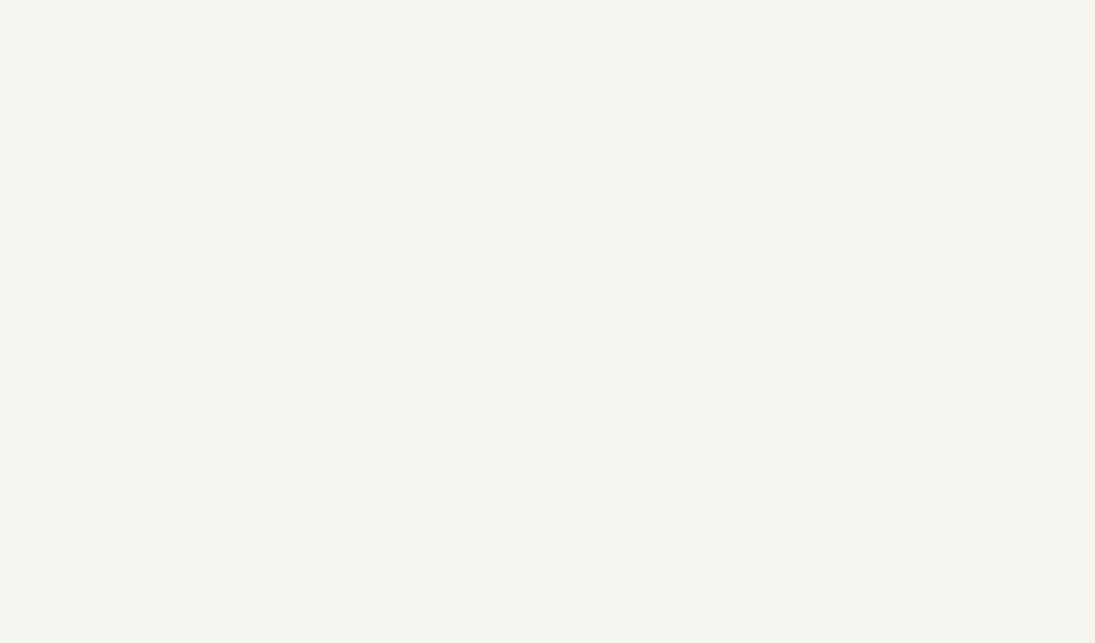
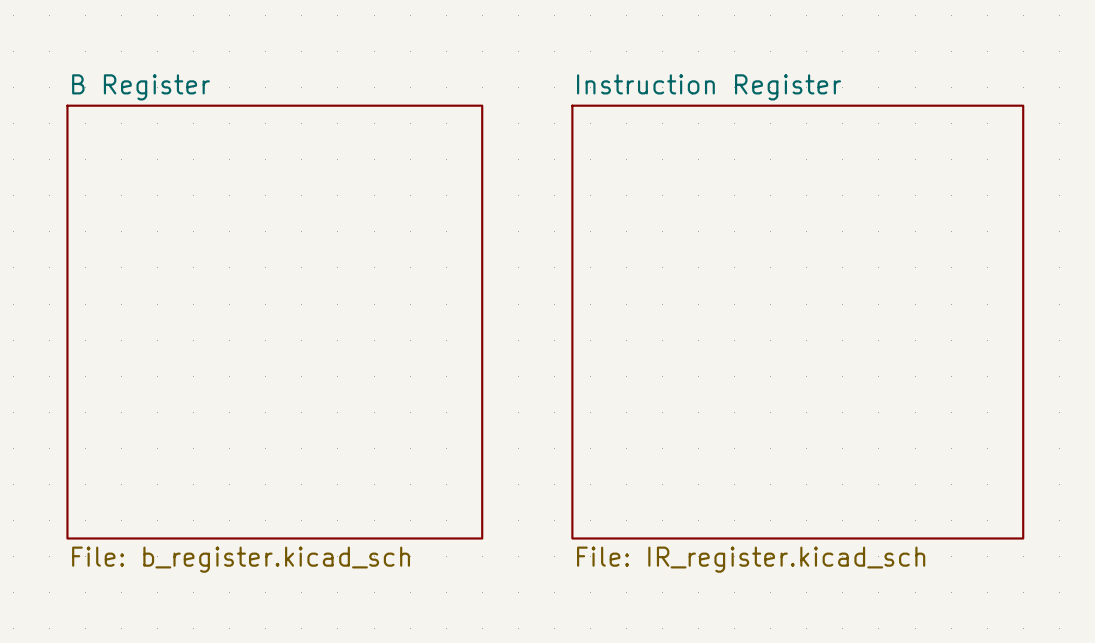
sheet B Register: none -> File: b_register.kicad_sch (274, 322)
sheet Instruction Register: none -> File: IR_register.kicad_sch (797, 322)

